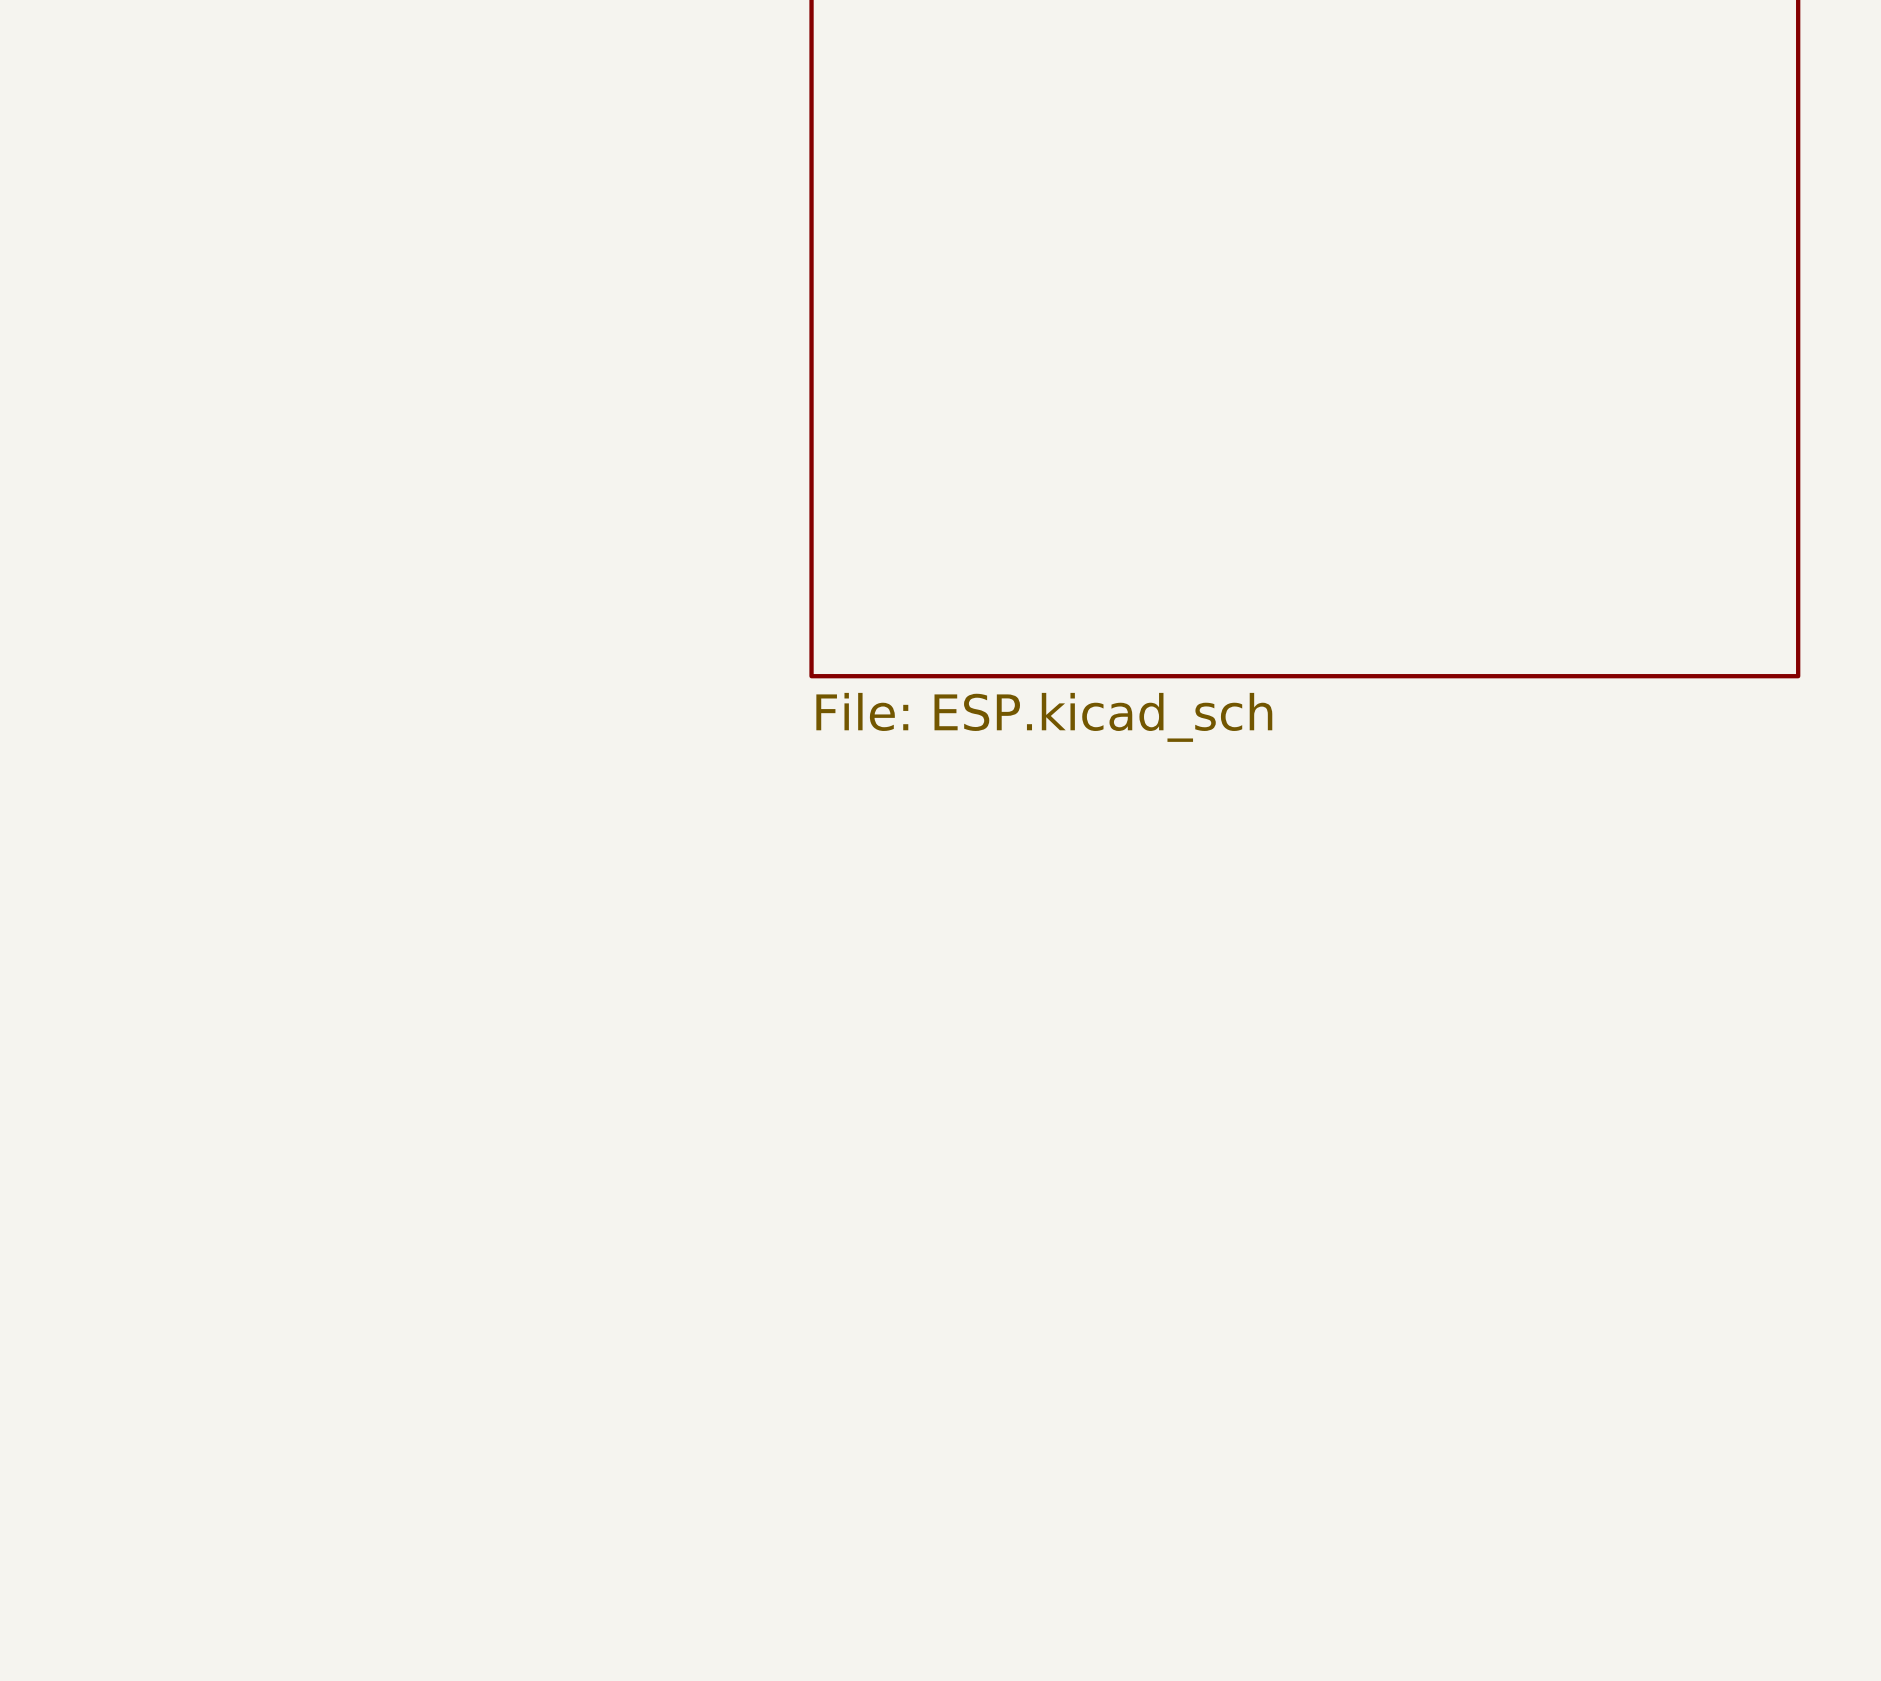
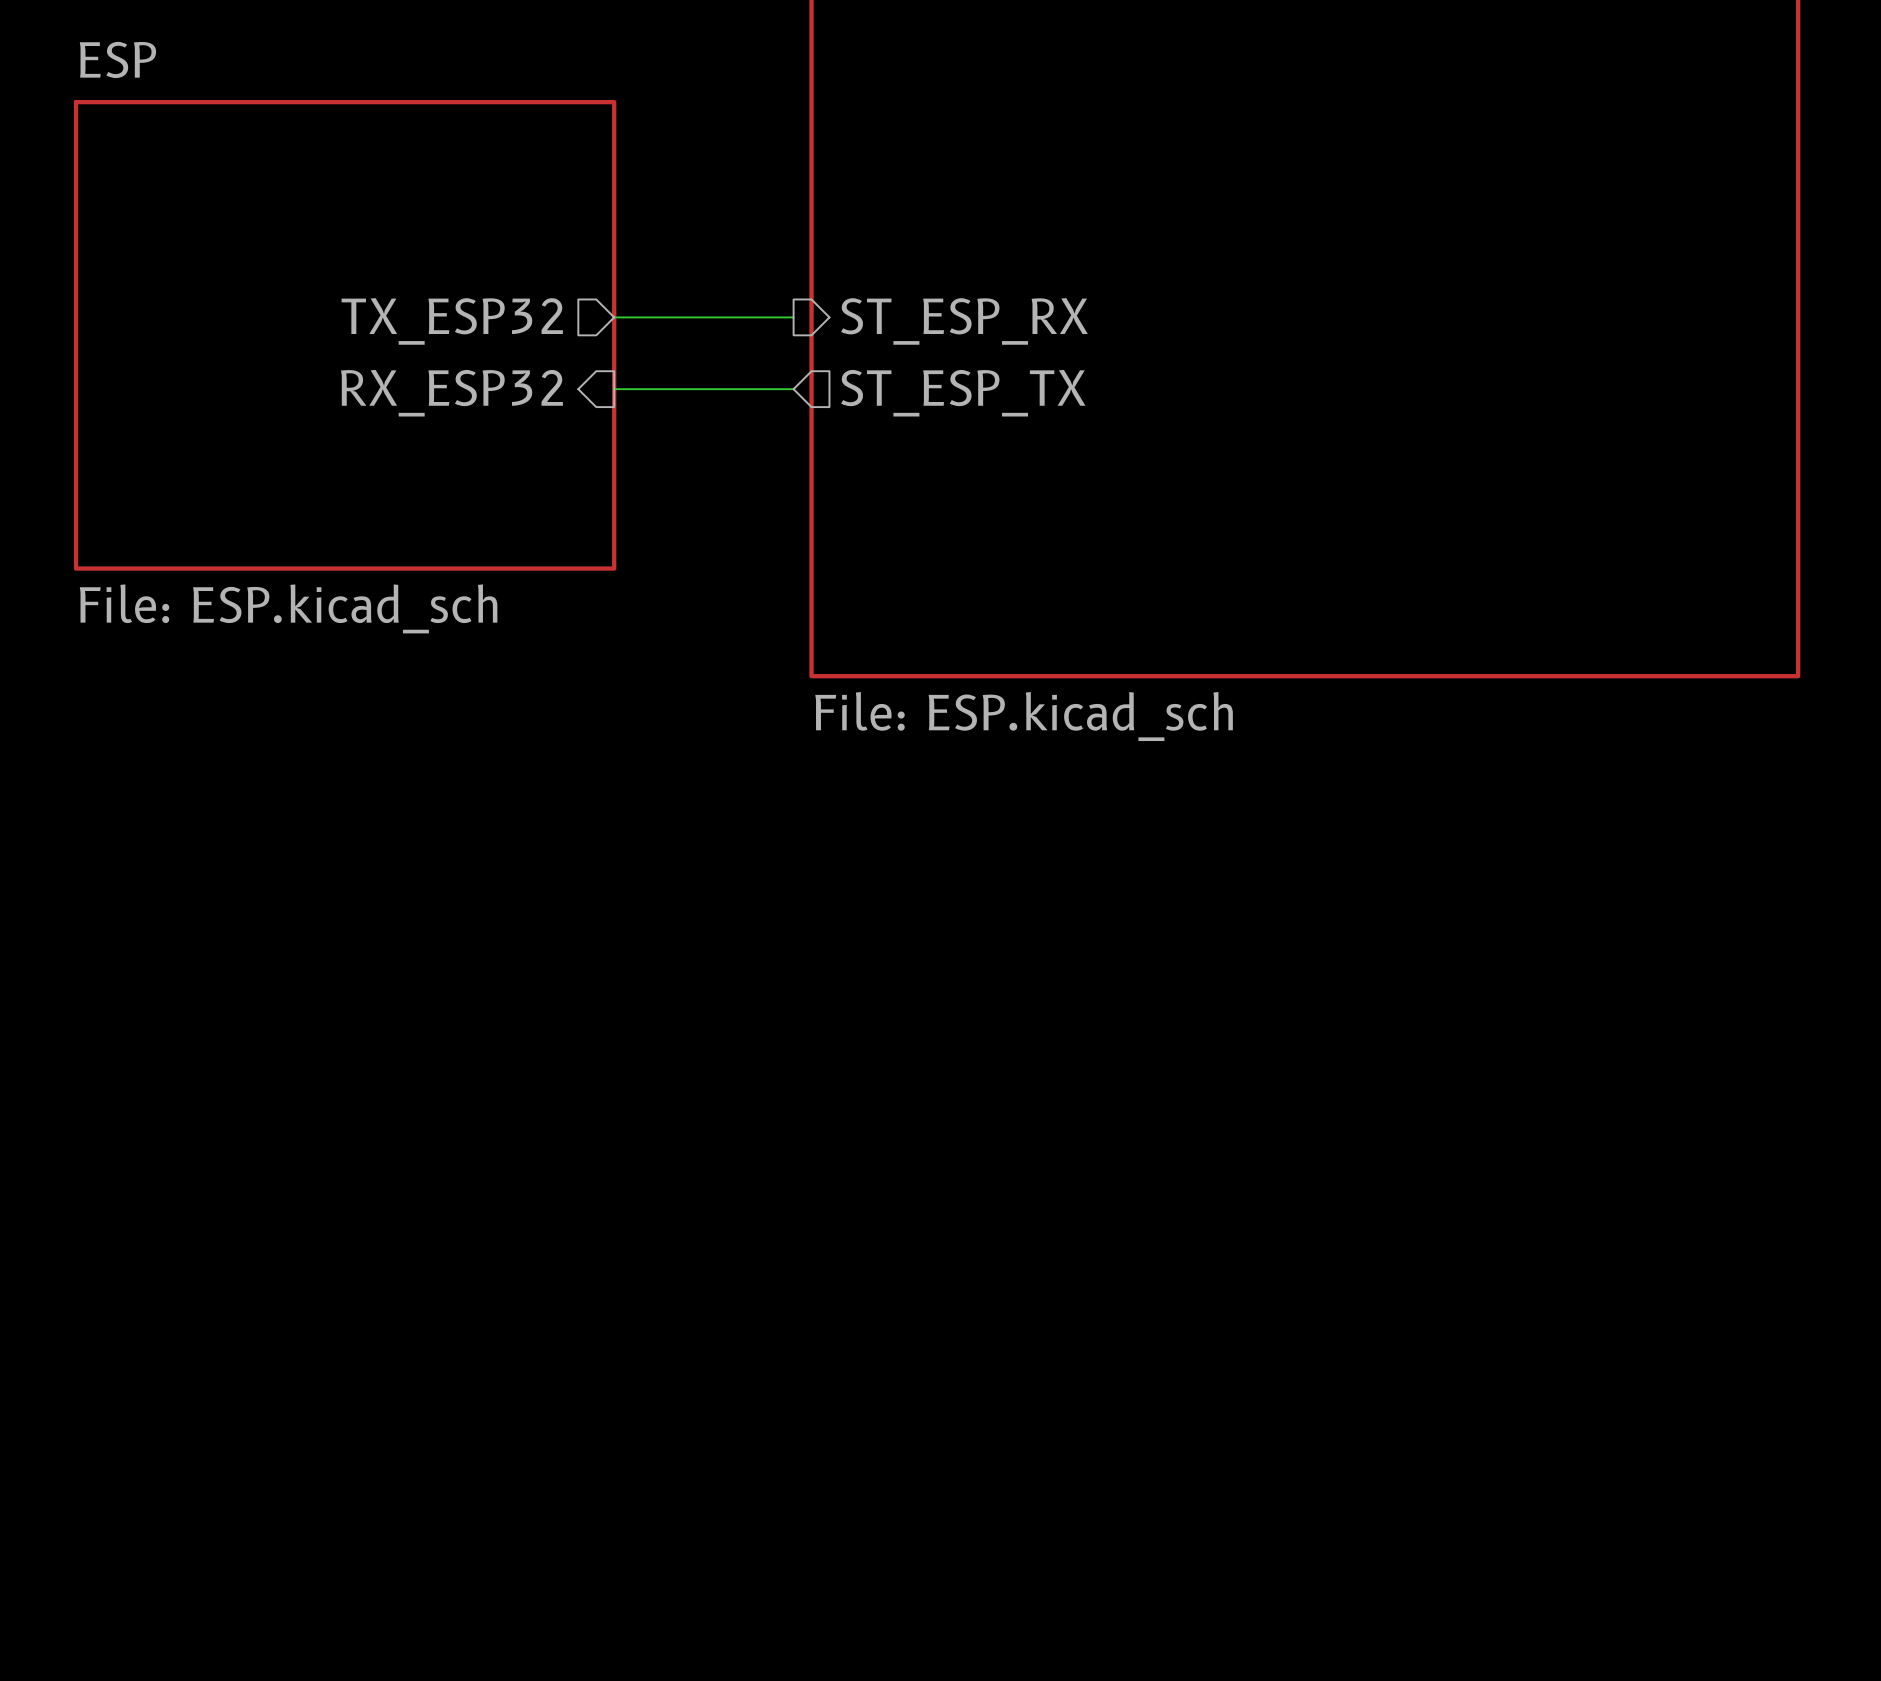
wire: none -> (614, 317) (793, 317)
sheet pin: none -> TX_ESP32 (452, 321)
sheet pin: none -> ST_ESP_RX (964, 321)
sheet ESP: none -> File: ESP.kicad_sch (345, 335)
wire: none -> (614, 389) (793, 389)
sheet pin: none -> RX_ESP32 (451, 393)
sheet pin: none -> ST_ESP_TX (963, 393)

